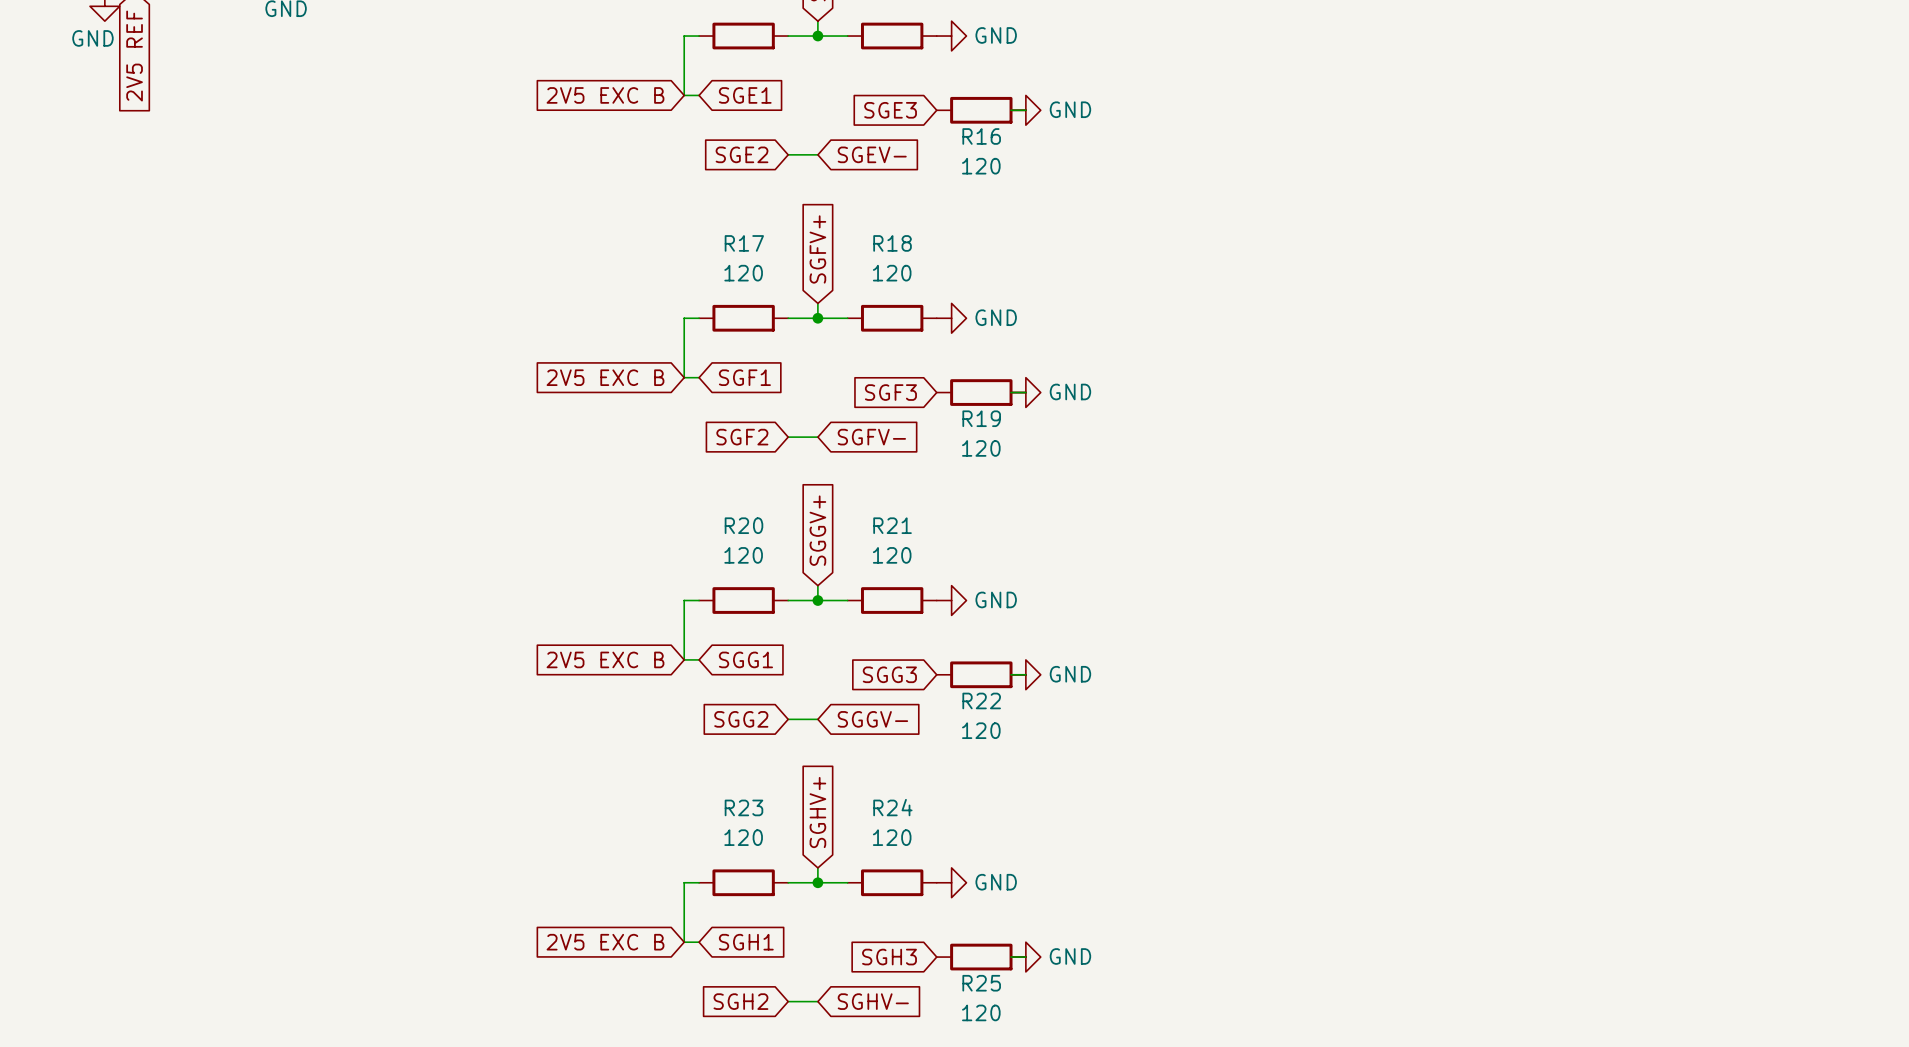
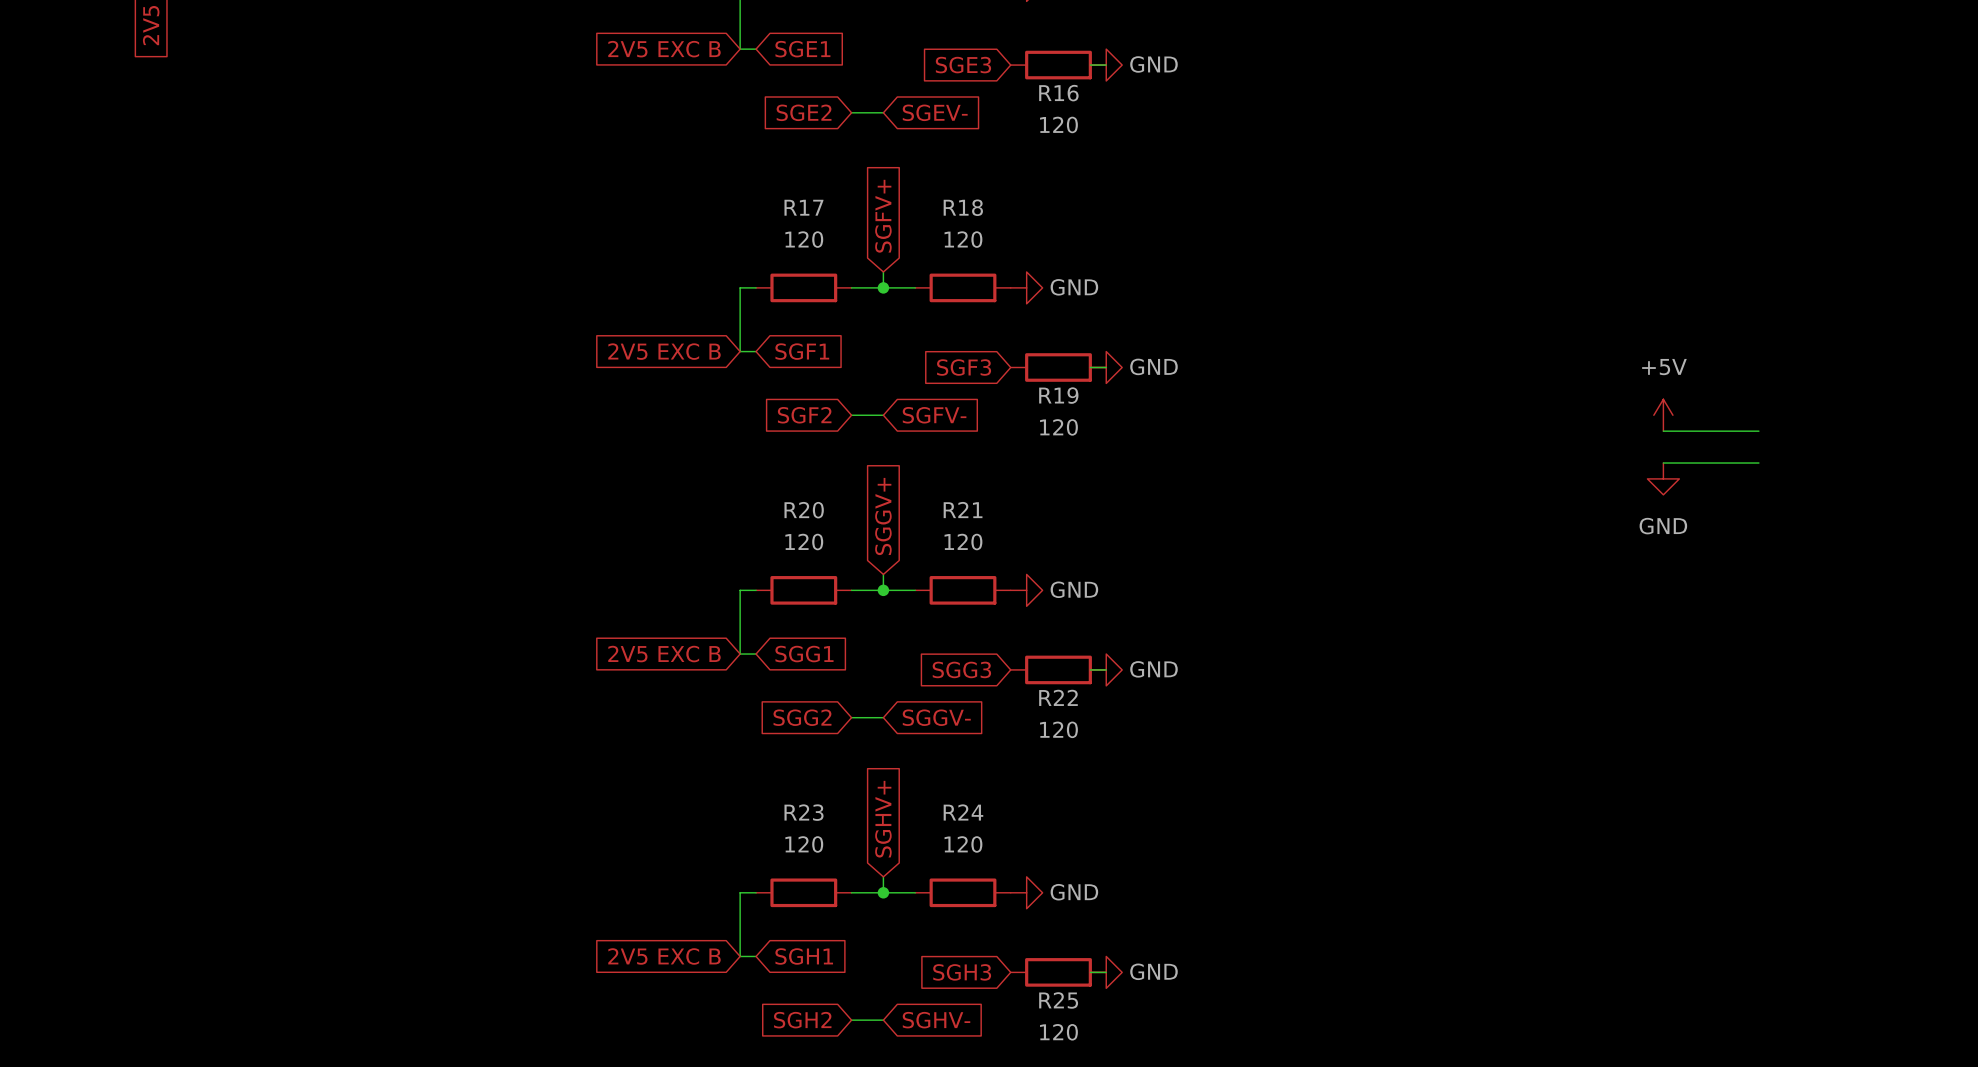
power symbol: none -> +5V (1663, 415)
wire: none -> (1663, 431) (1758, 431)
wire: none -> (1663, 463) (1758, 463)
power symbol: none -> GND (1663, 478)

